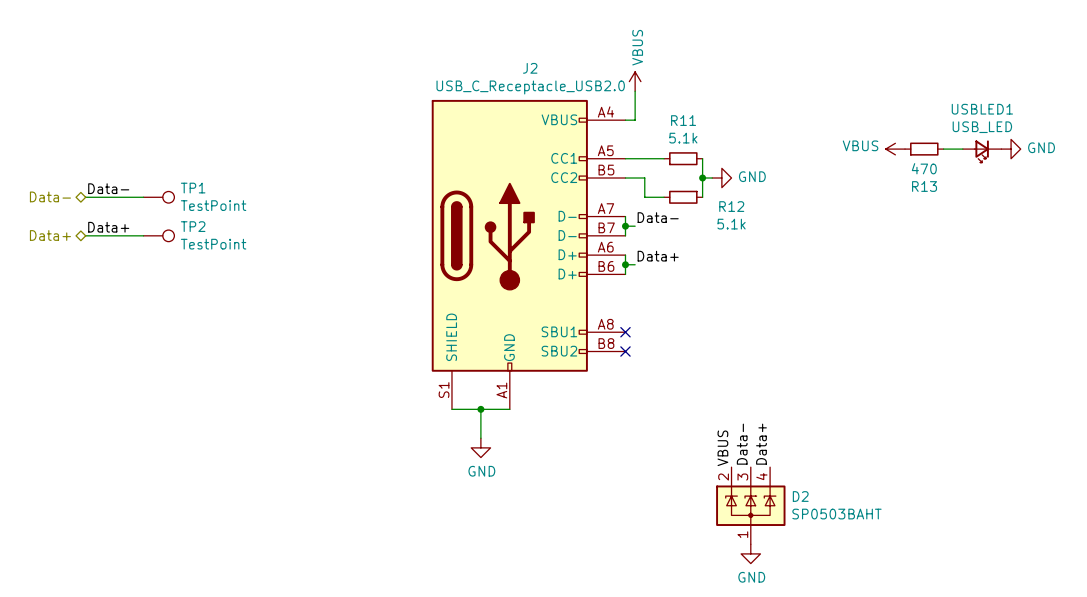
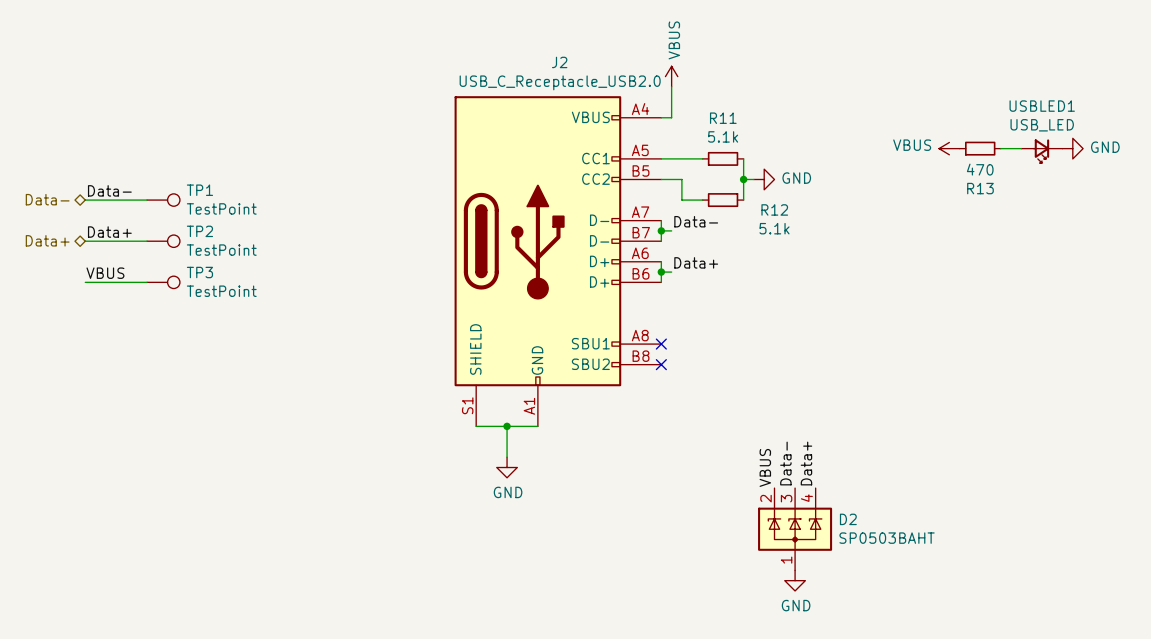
label: none -> VBUS (105, 273)
wire: none -> (85, 282) (147, 282)
TP3: none -> TestPoint (163, 282)

